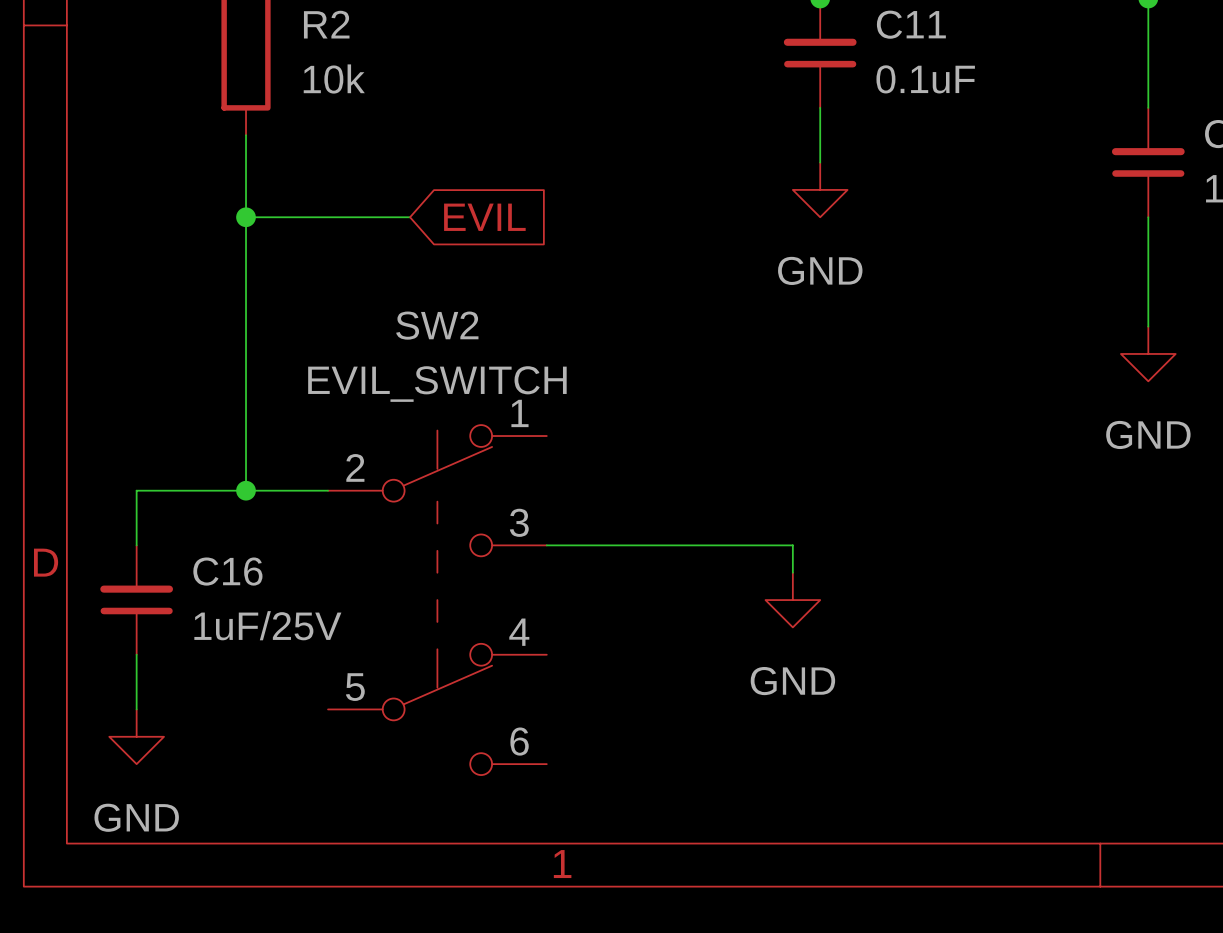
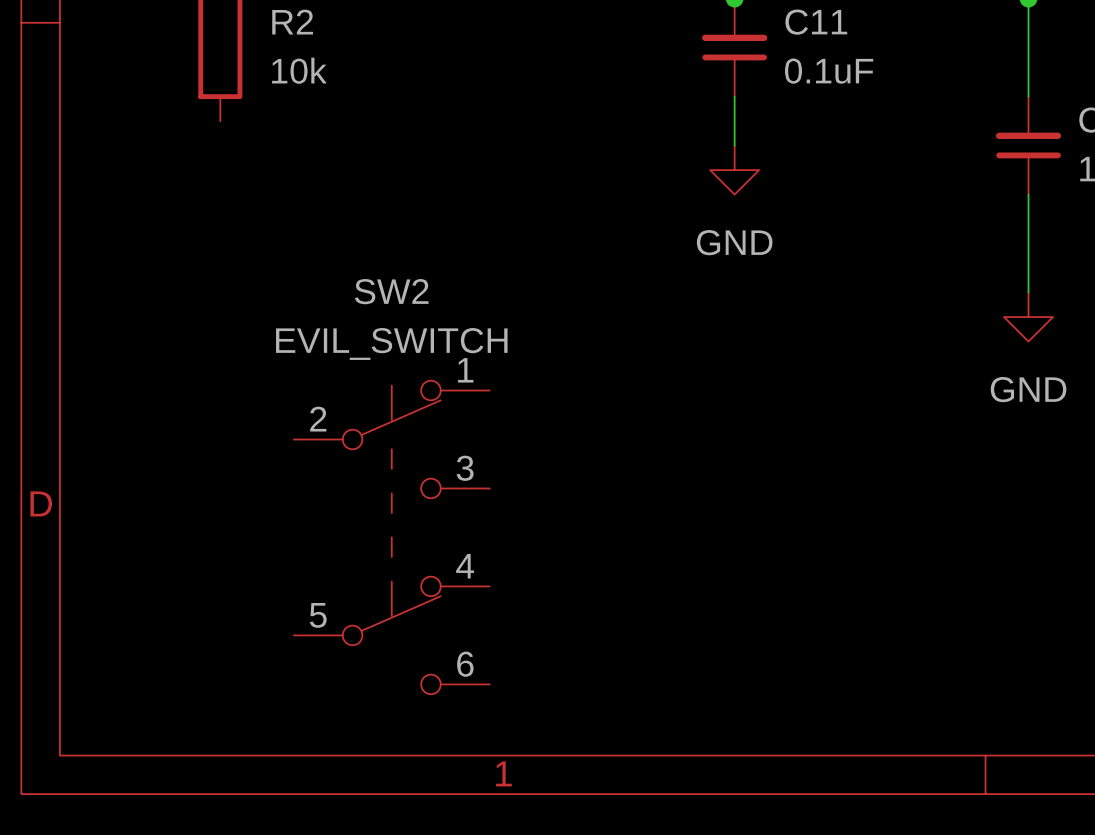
wire: (246, 135) (246, 490) -> none
wire: (246, 217) (410, 217) -> none
junction: (246, 217) -> none
global label: EVIL (484, 217) -> none
junction: (246, 490) -> none
wire: (328, 490) (136, 490) (136, 545) -> none
wire: (546, 545) (792, 545) (792, 572) -> none
C16: 1uF/25V (136, 600) -> none
power symbol: GND (792, 600) -> none
wire: (136, 654) (136, 709) -> none
power symbol: GND (136, 736) -> none

